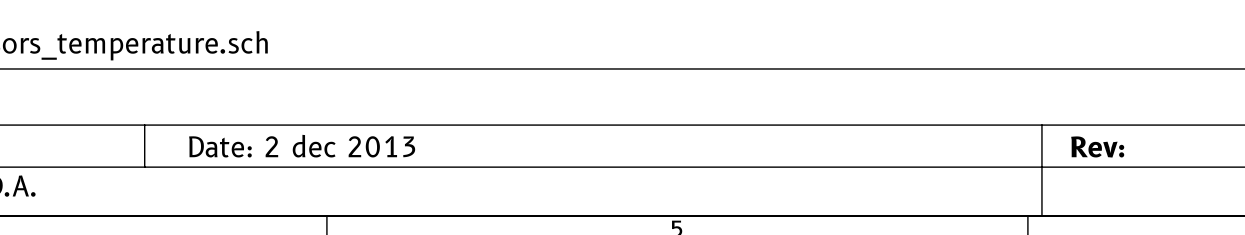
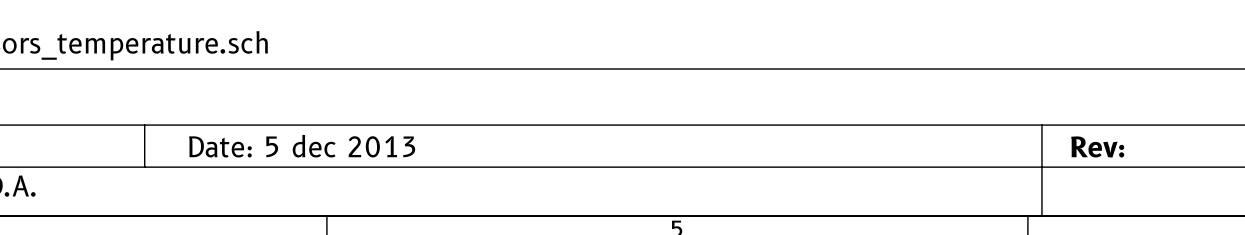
title block: Date: 2 dec 2013 (302, 146) -> Date: 5 dec 2013 (302, 146)

